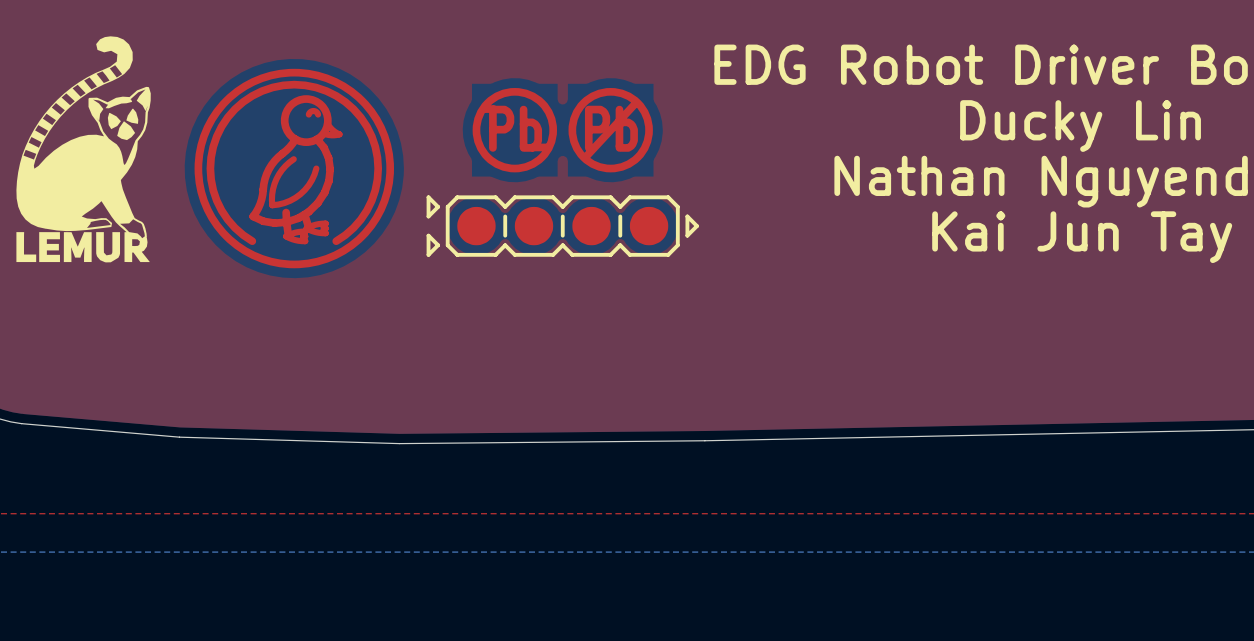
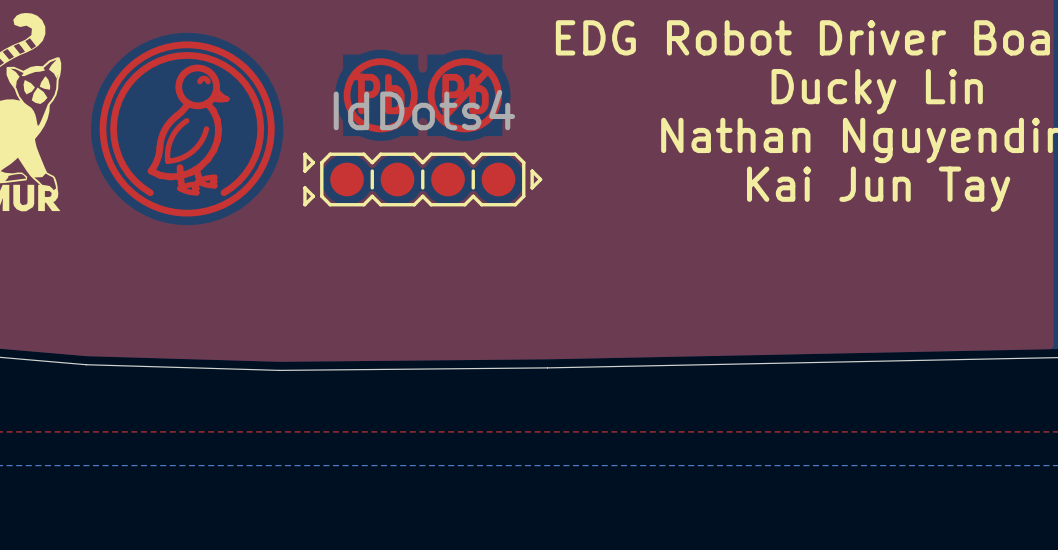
drawing shape: [426, 195, 699, 257] -> [303, 89, 543, 207]

